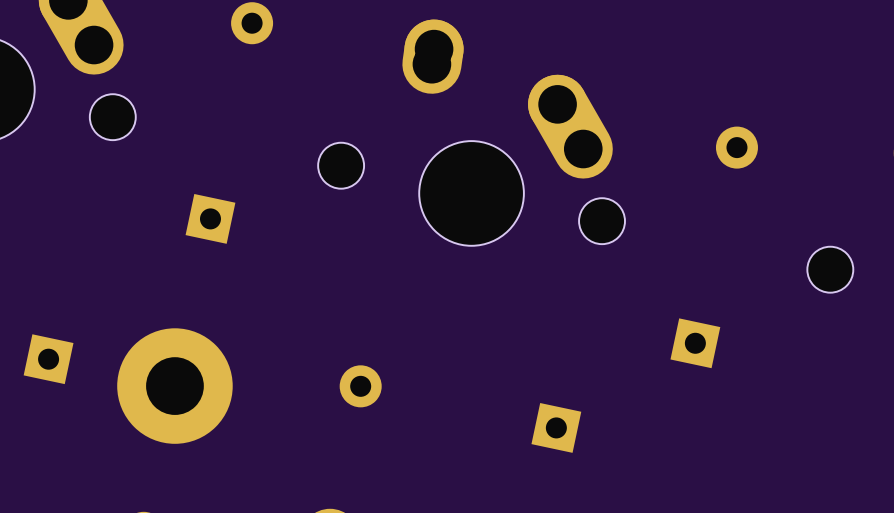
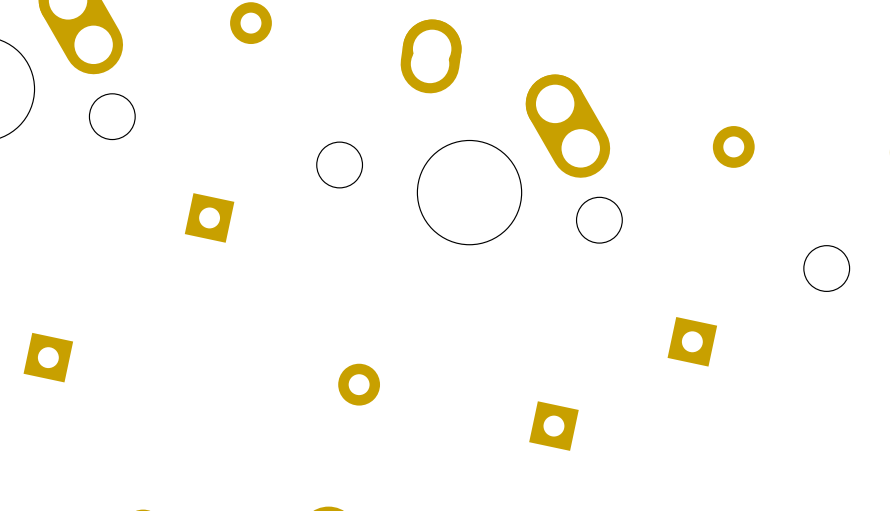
part: (174, 386) -> none

